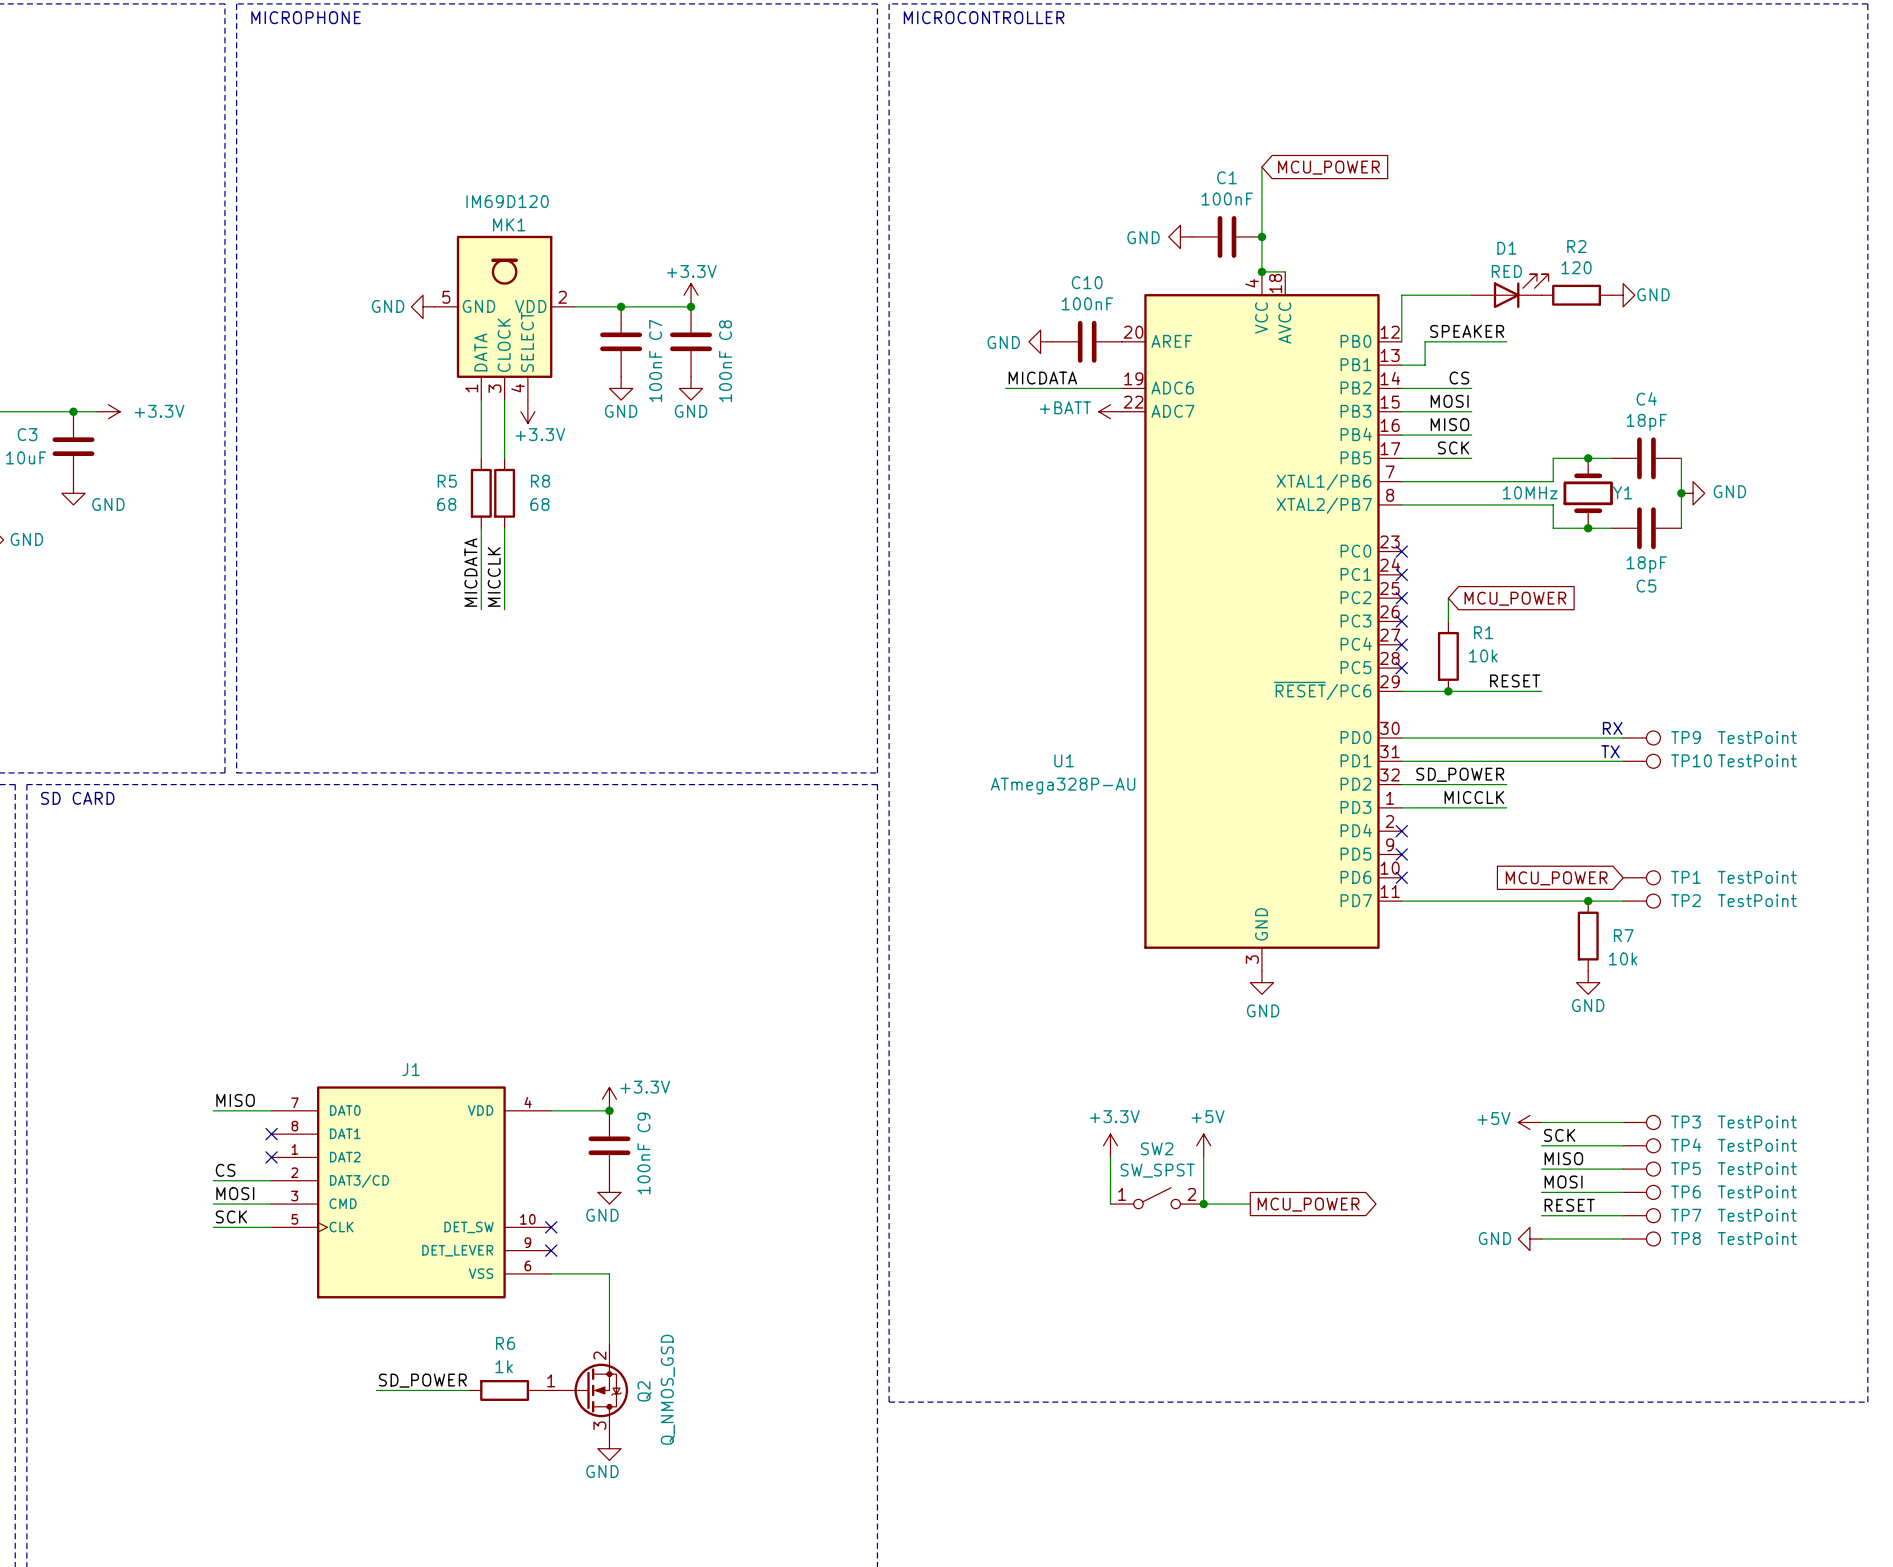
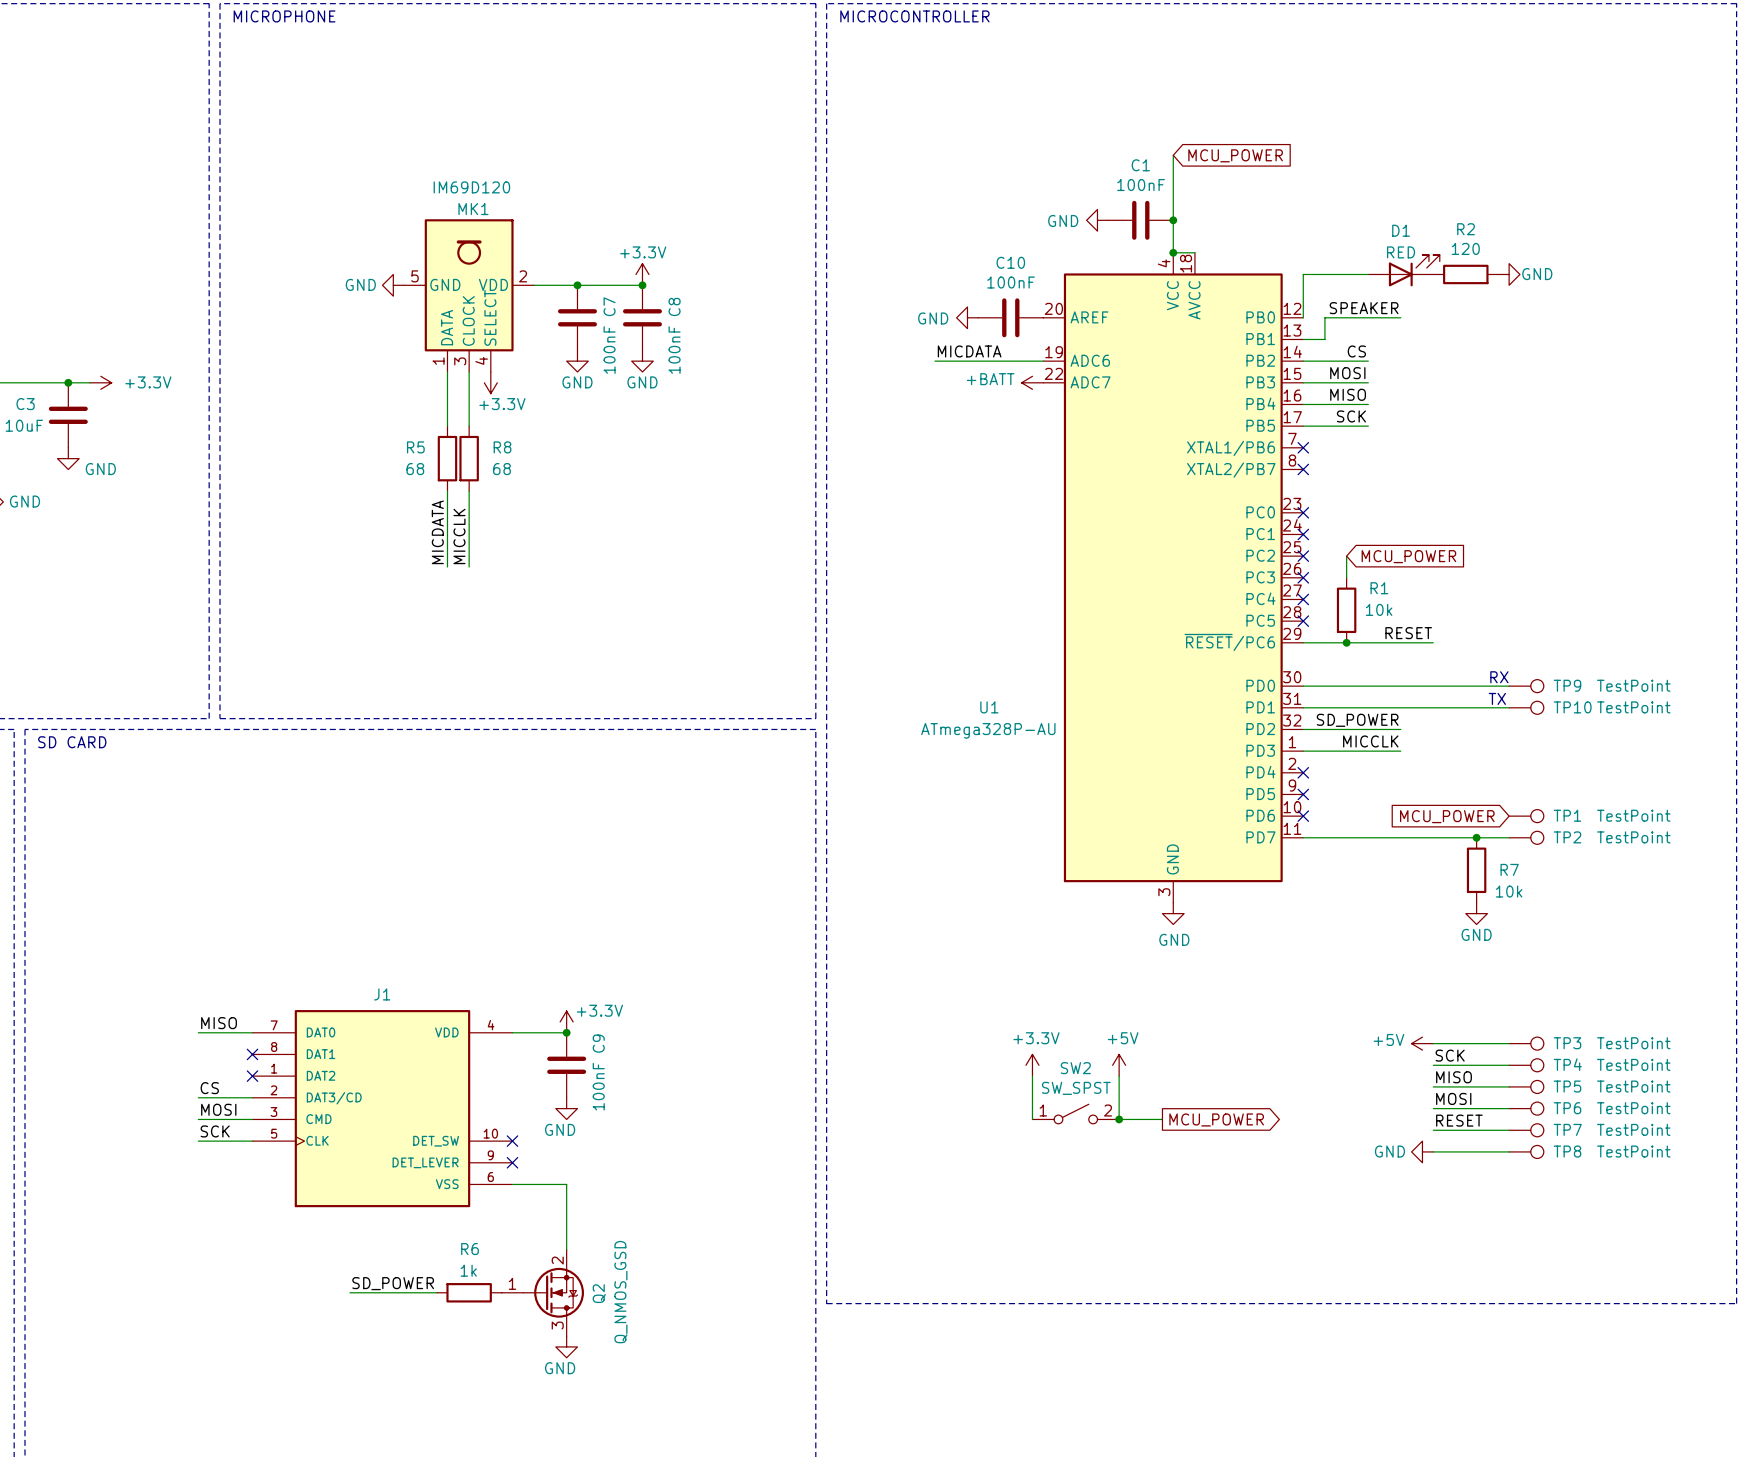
junction: (1588, 458) -> none
wire: (1611, 458) (1553, 458) (1553, 481) (1401, 481) -> none
C4: 18pF (1646, 458) -> none
wire: (1681, 458) (1681, 528) -> none
no-connect mark: none -> (1303, 447)
Y1: 10MHz (1588, 493) -> none
junction: (1681, 493) -> none
power symbol: GND (1693, 493) -> none
wire: (1401, 504) (1553, 504) (1553, 528) (1611, 528) -> none
no-connect mark: none -> (1303, 469)
junction: (1588, 528) -> none
C5: 18pF (1646, 528) -> none

